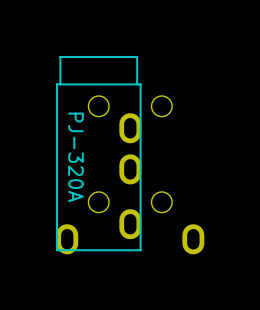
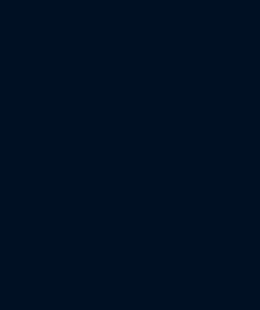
part: (130, 155) -> none

